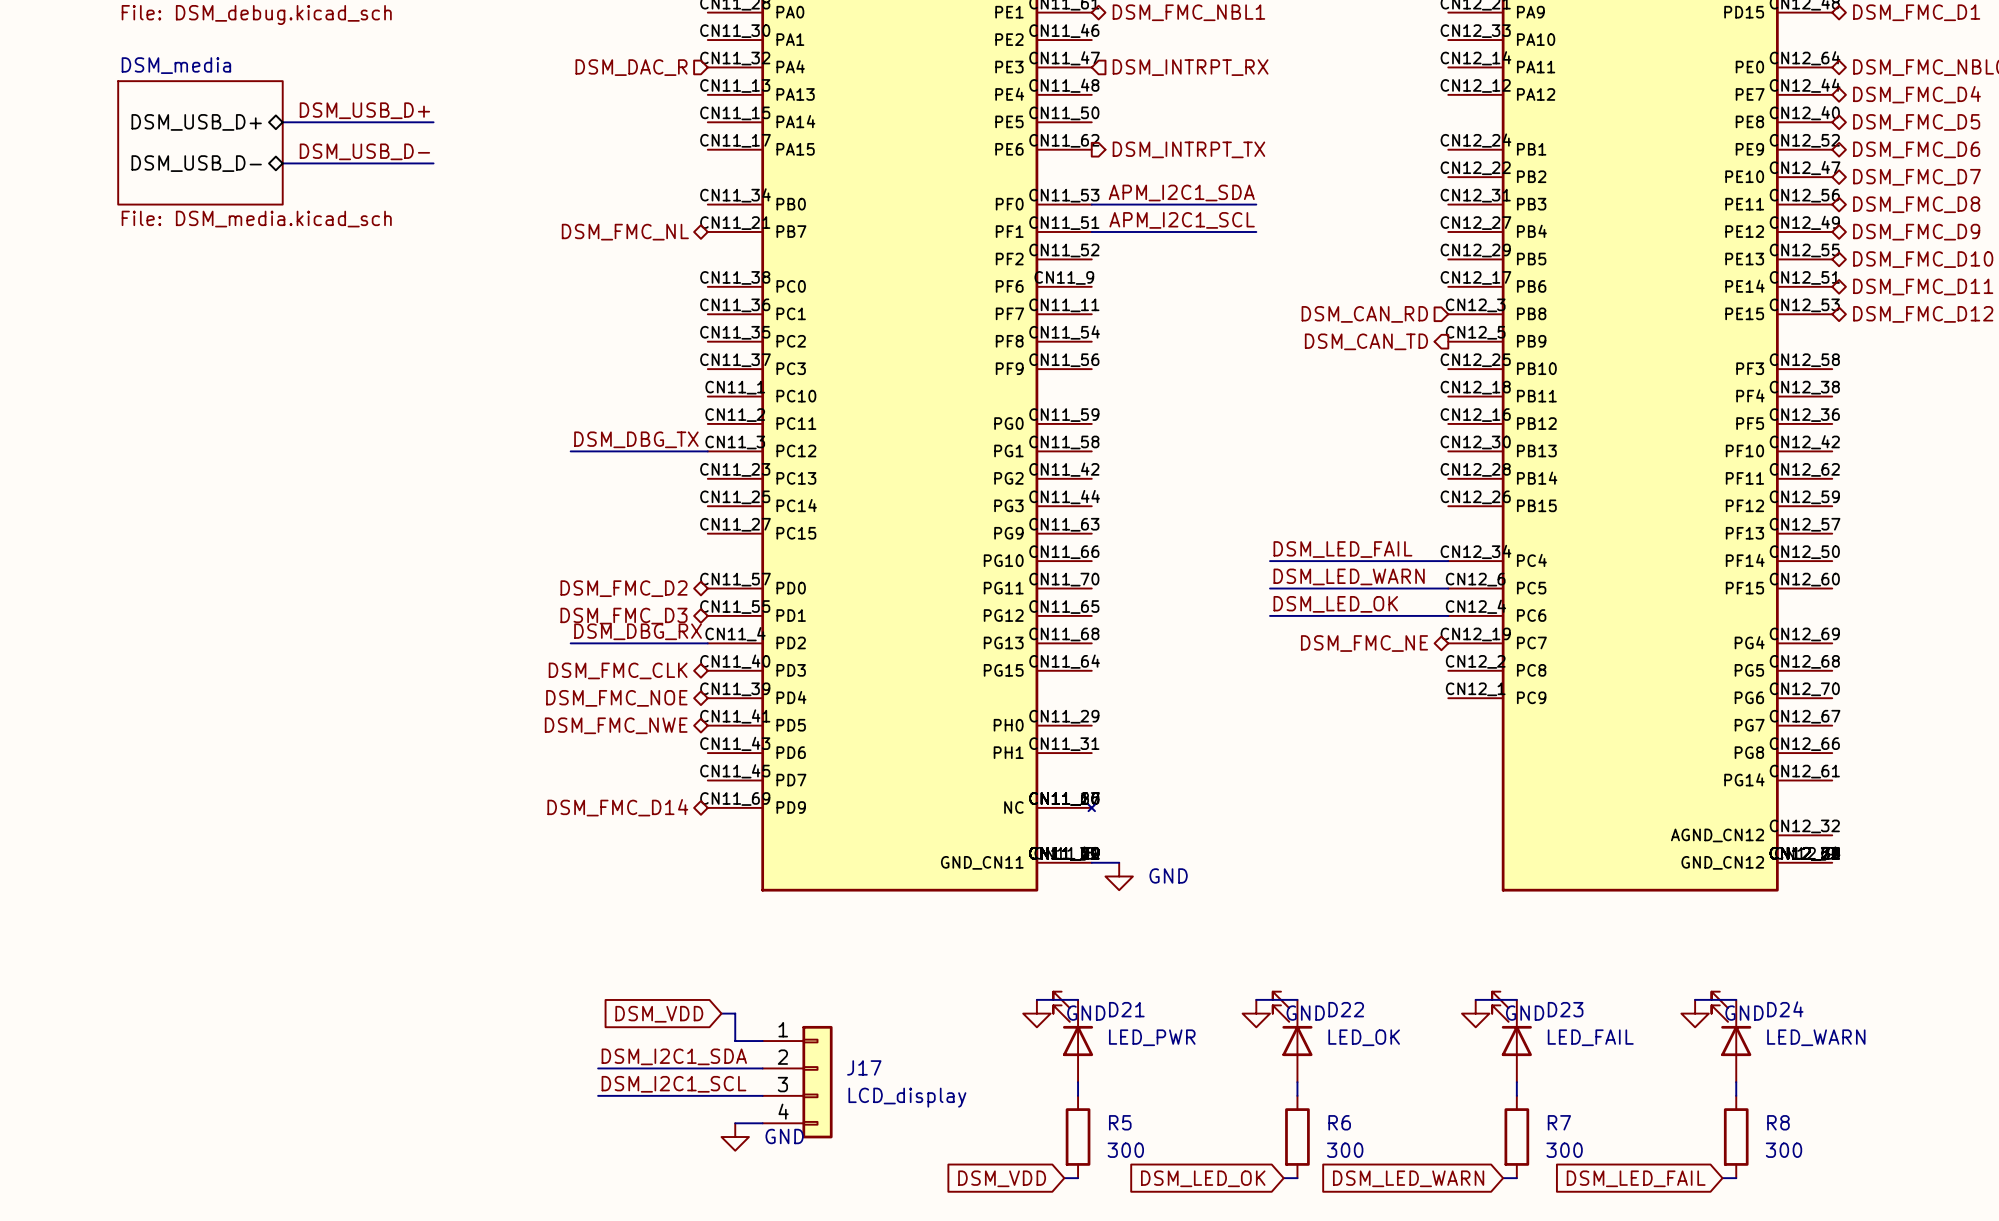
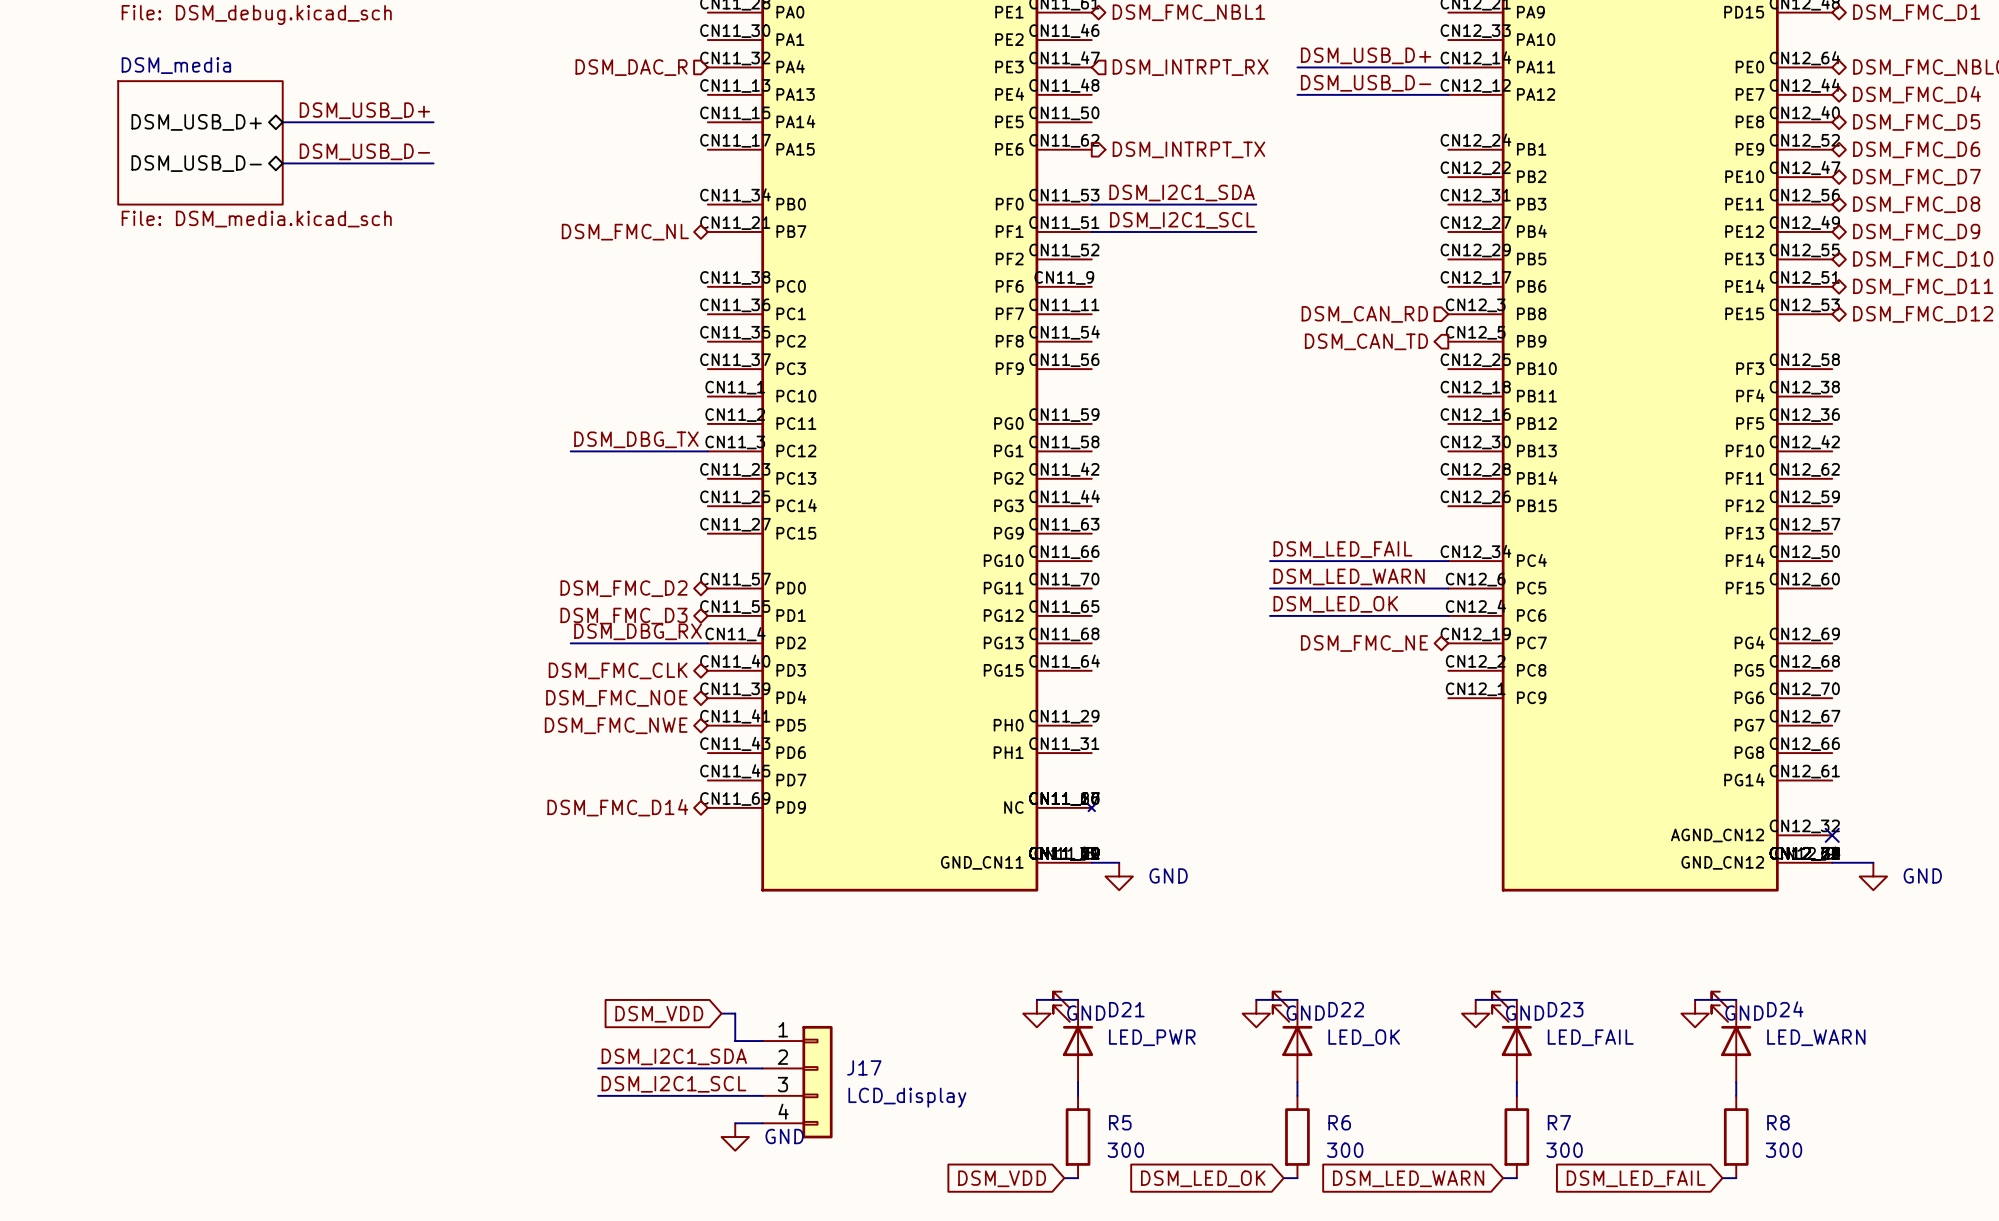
label: none -> DSM_USB_D+ (1366, 55)
wire: none -> (1297, 67) (1448, 67)
label: none -> DSM_USB_D- (1366, 83)
wire: none -> (1297, 94) (1448, 94)
label: APM_I2C1_SDA (1181, 192) -> DSM_I2C1_SDA (1182, 192)
label: APM_I2C1_SCL (1182, 220) -> DSM_I2C1_SCL (1182, 220)
no-connect mark: none -> (1832, 835)
wire: none -> (1832, 862) (1873, 862)
power symbol: none -> GND (1873, 876)

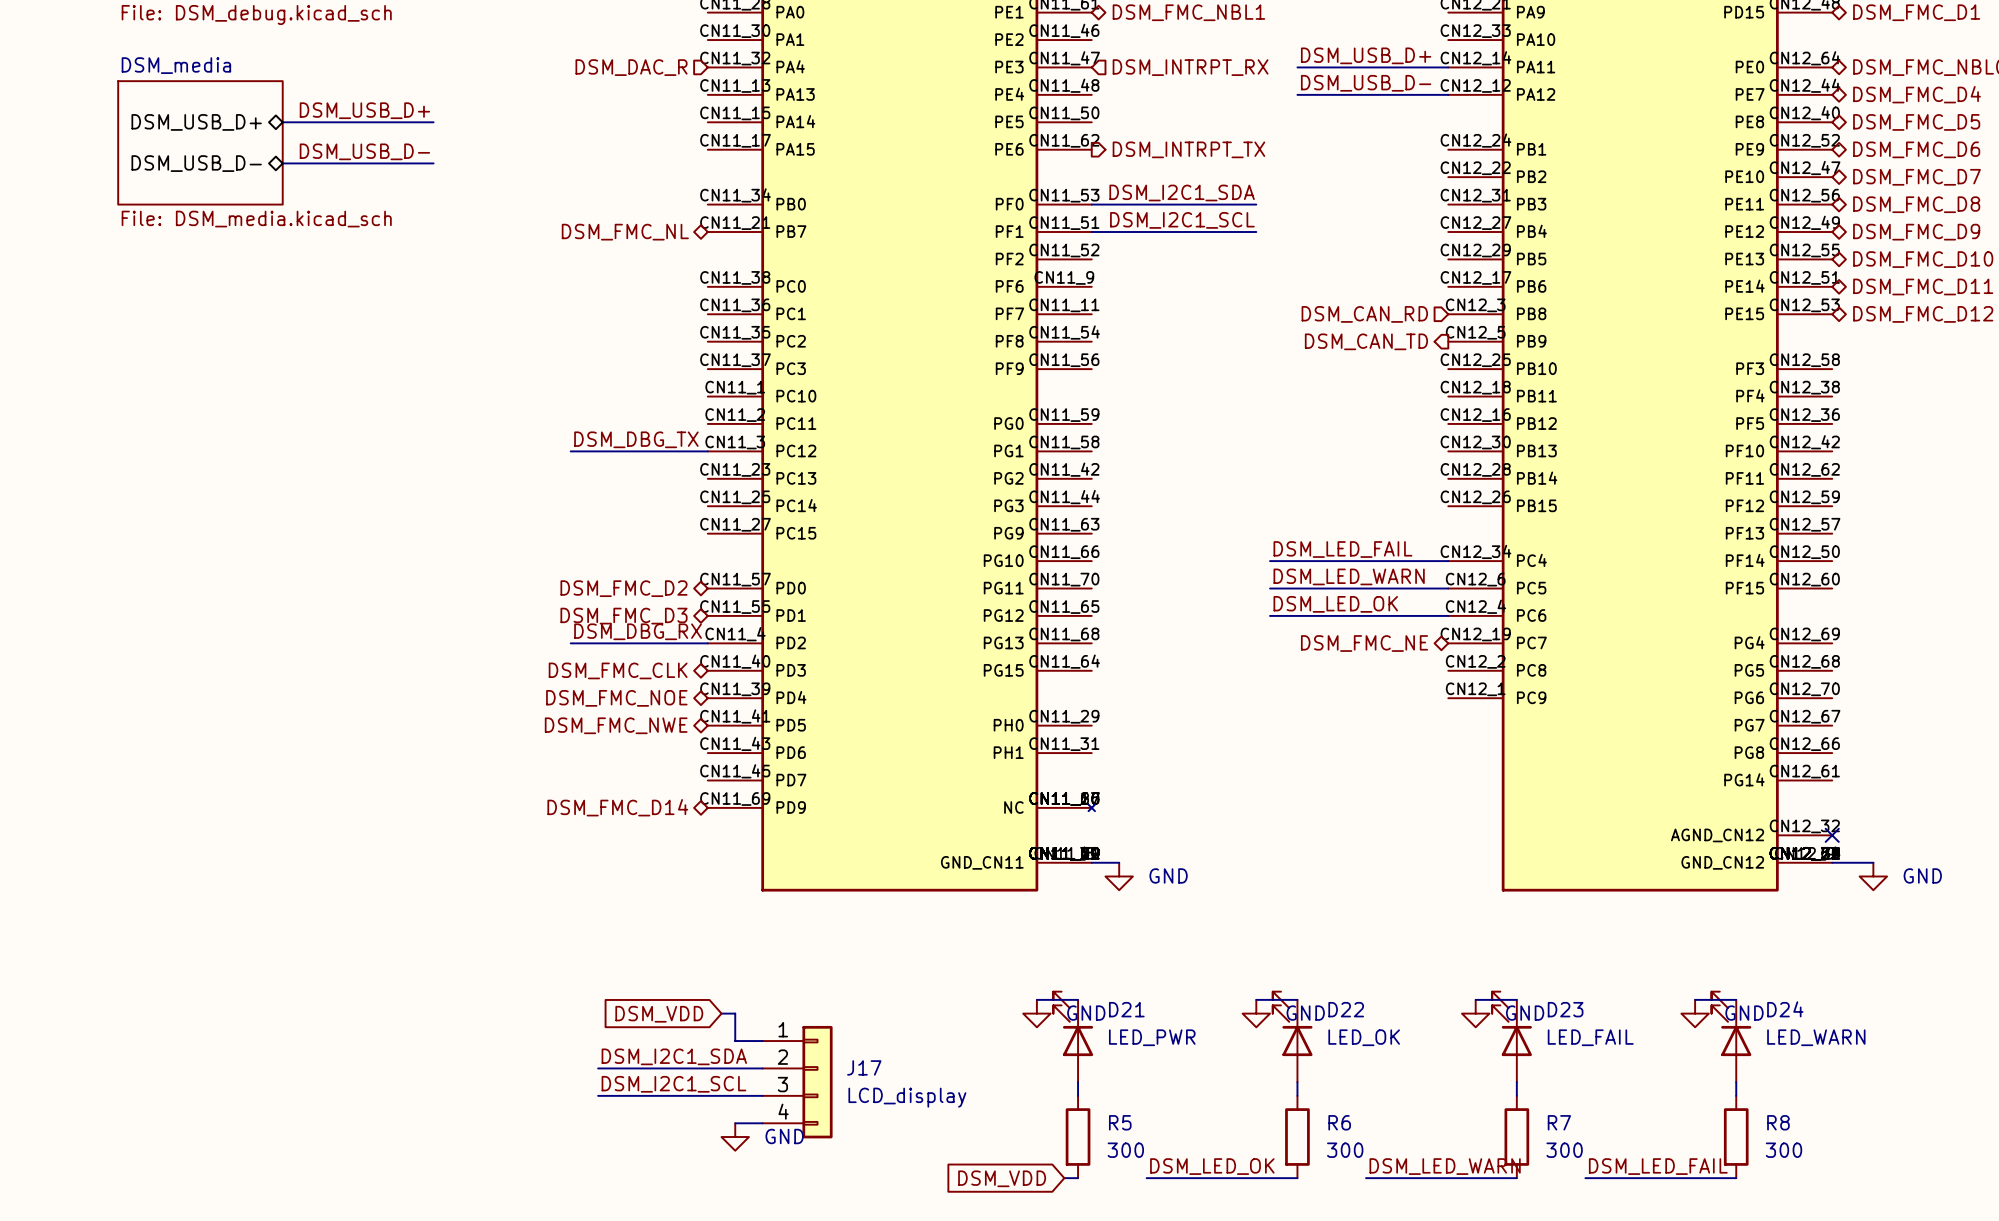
label: none -> DSM_LED_OK (1212, 1166)
label: none -> DSM_LED_WARN (1445, 1166)
label: none -> DSM_LED_FAIL (1658, 1166)
wire: none -> (1146, 1178) (1283, 1178)
global label: DSM_LED_OK (1203, 1178) -> none
wire: none -> (1366, 1178) (1503, 1178)
global label: DSM_LED_WARN (1408, 1178) -> none
wire: none -> (1585, 1178) (1722, 1178)
global label: DSM_LED_FAIL (1636, 1178) -> none

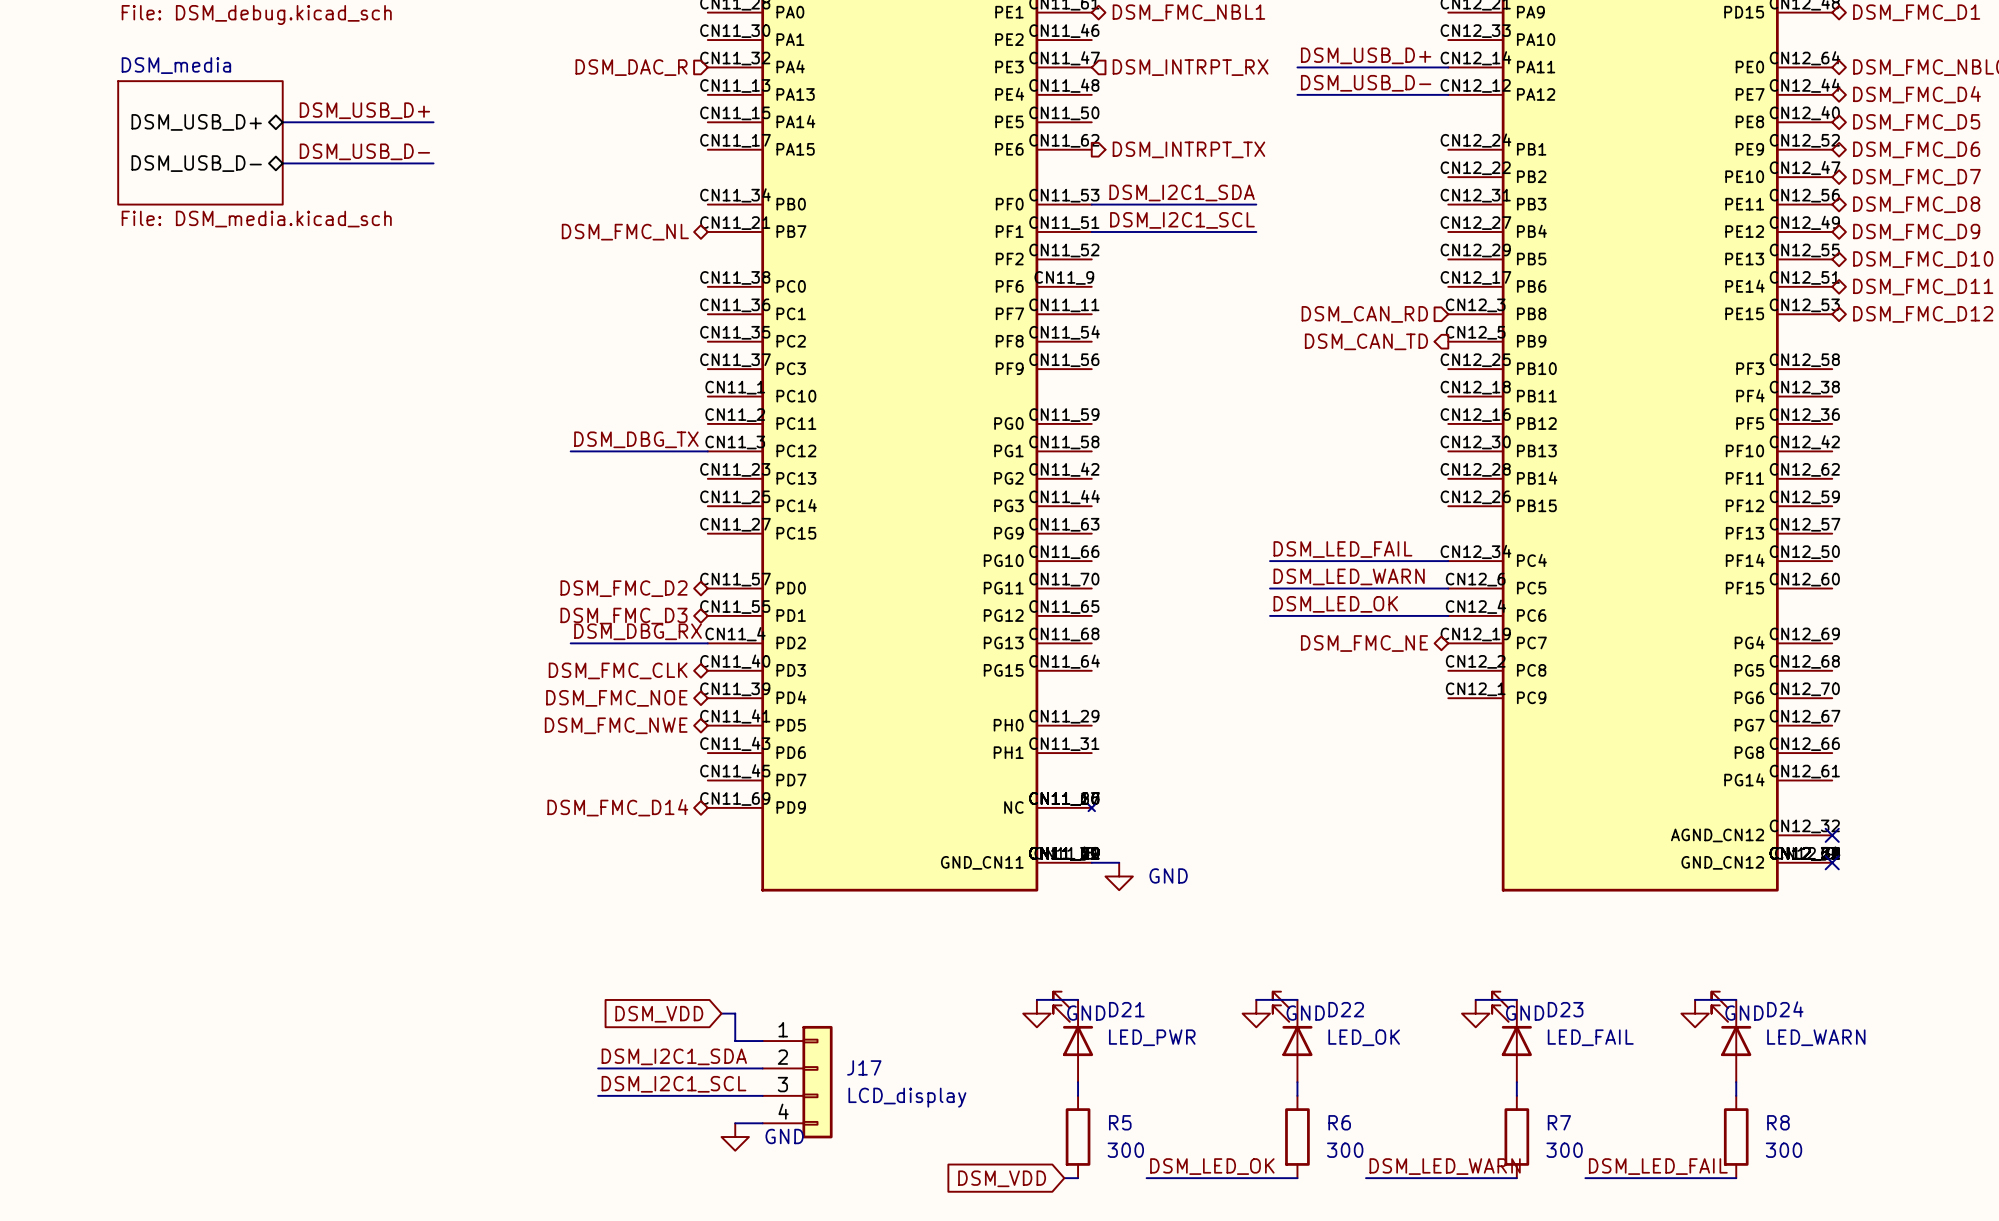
wire: (1832, 862) (1873, 862) -> none
no-connect mark: none -> (1832, 862)
power symbol: GND (1873, 876) -> none

